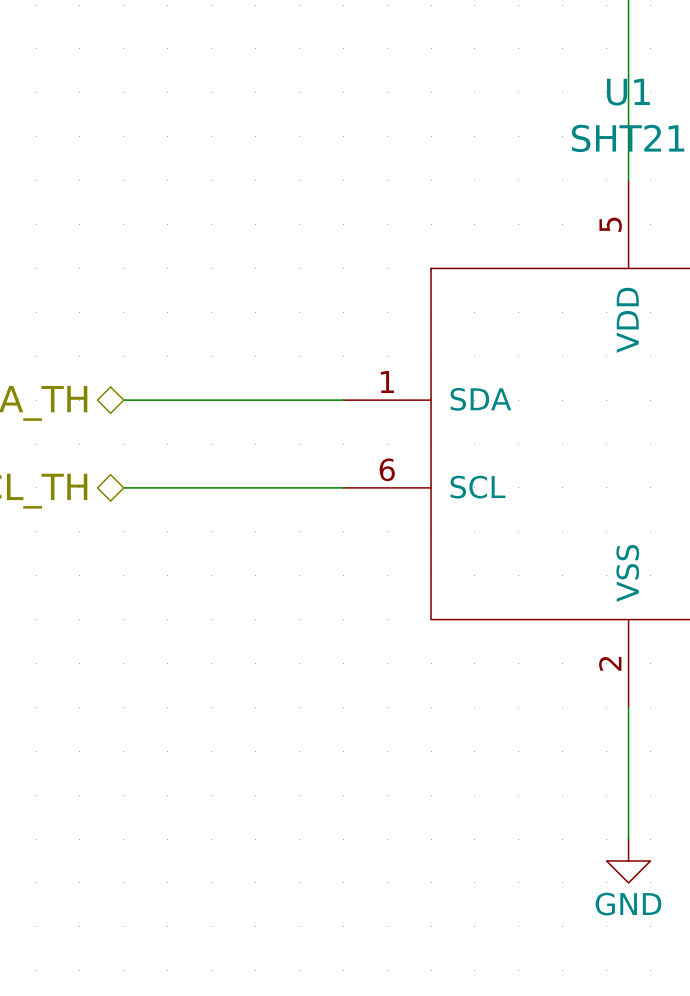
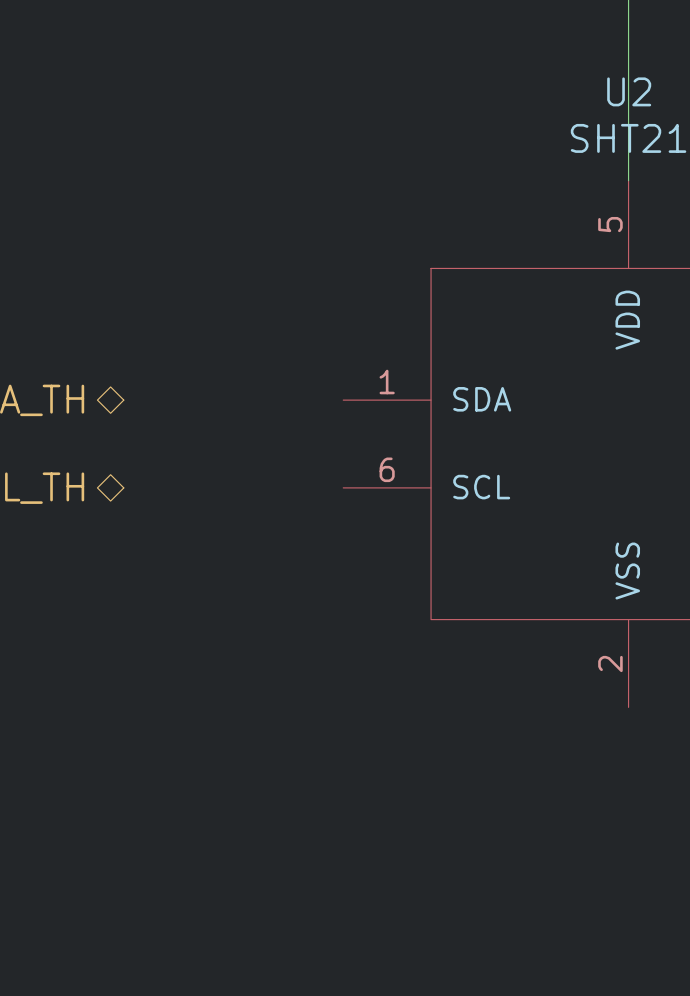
U1 name: U1 (628, 92) -> U2 (629, 91)
wire: (123, 400) (343, 400) -> none
wire: (123, 487) (343, 487) -> none
wire: (628, 707) (628, 839) -> none
power symbol: GND (628, 860) -> none

